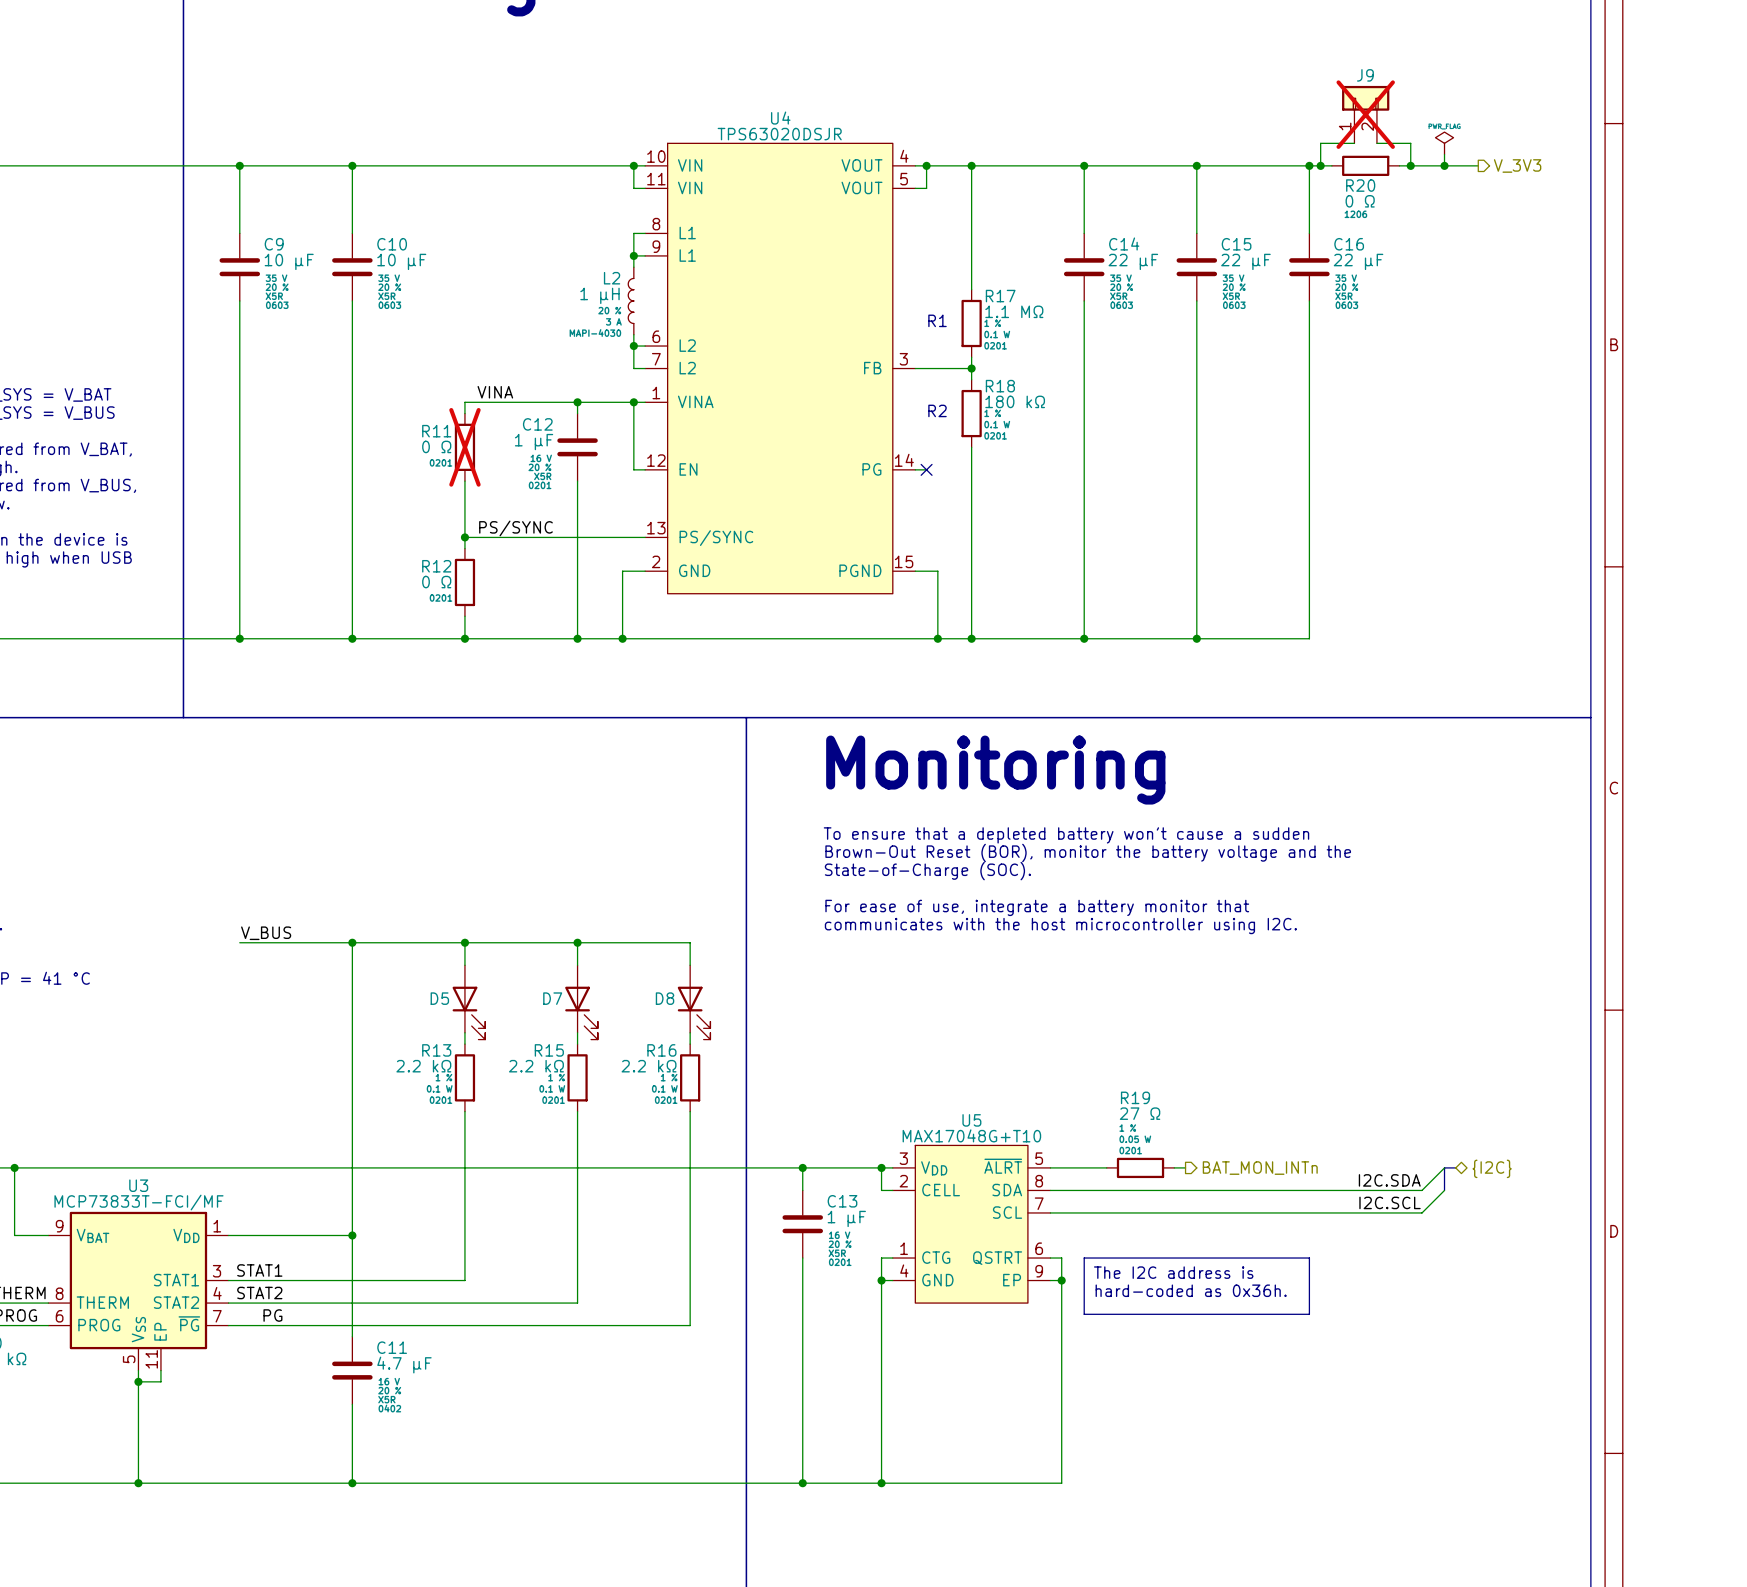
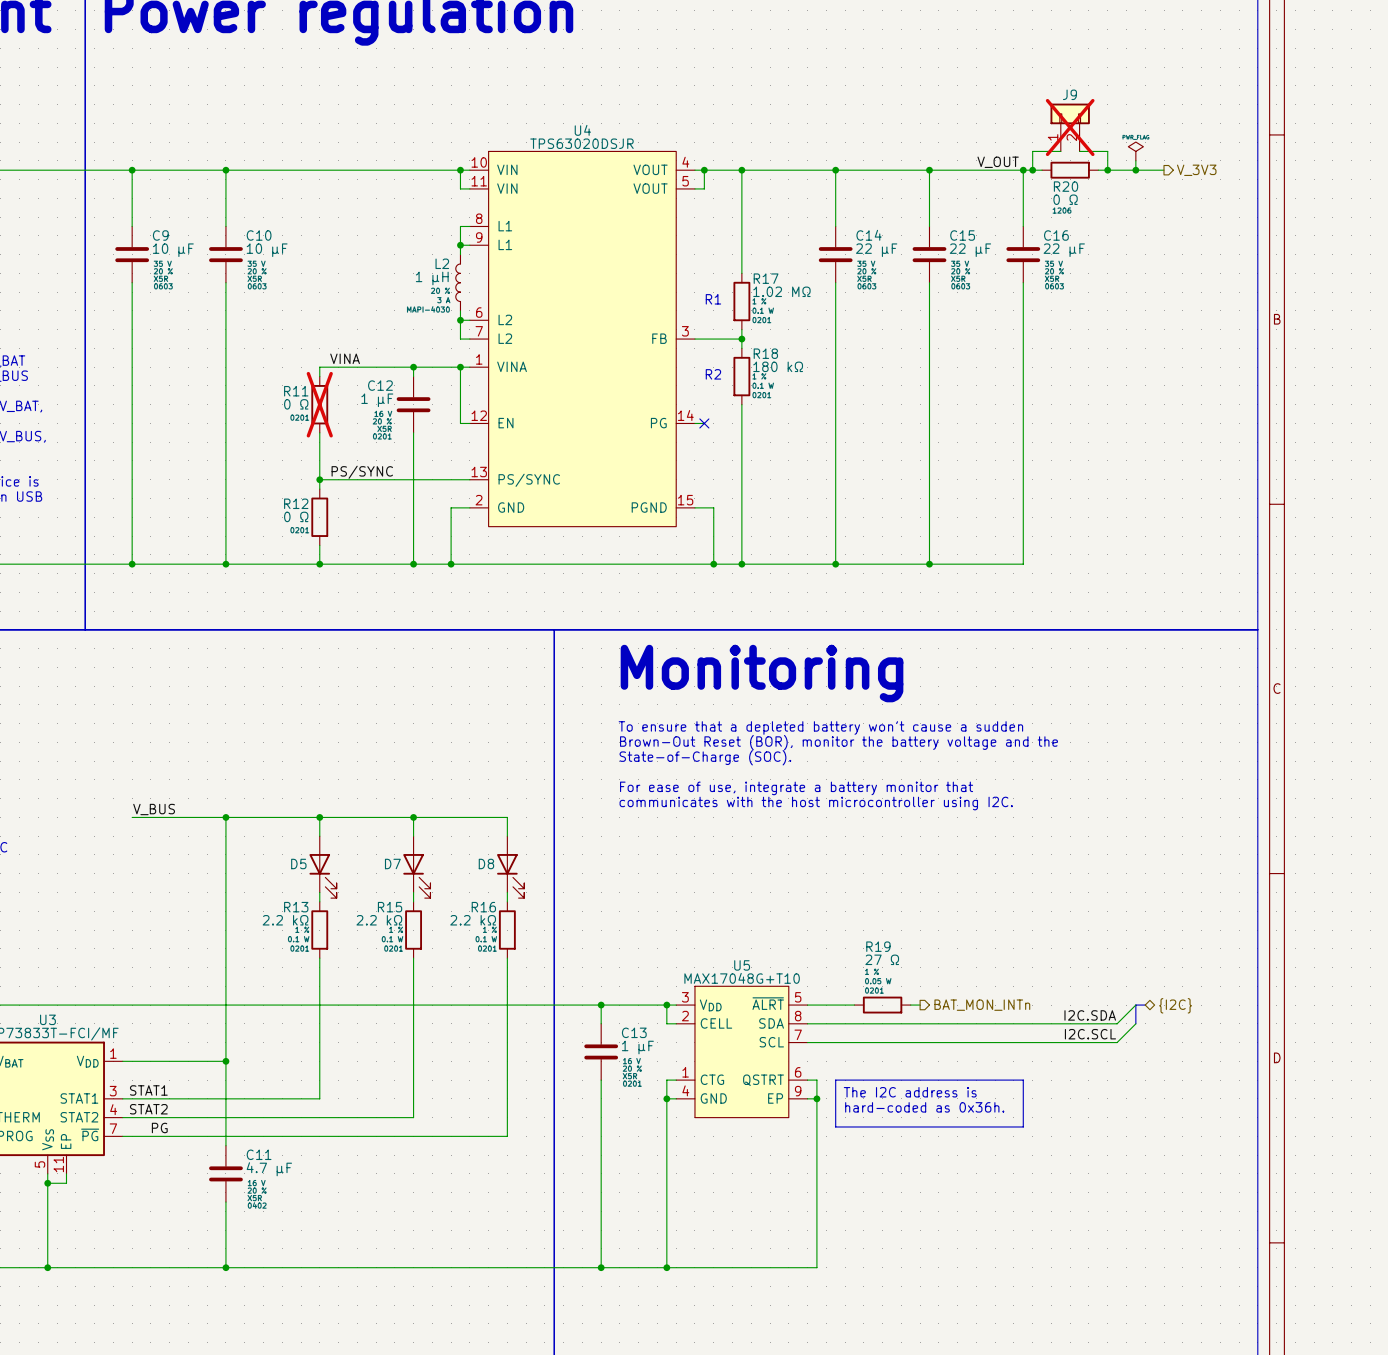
label: none -> V_OUT (998, 162)
R17 value: 1.1 MΩ (1014, 311) -> 1.02 MΩ (781, 291)

